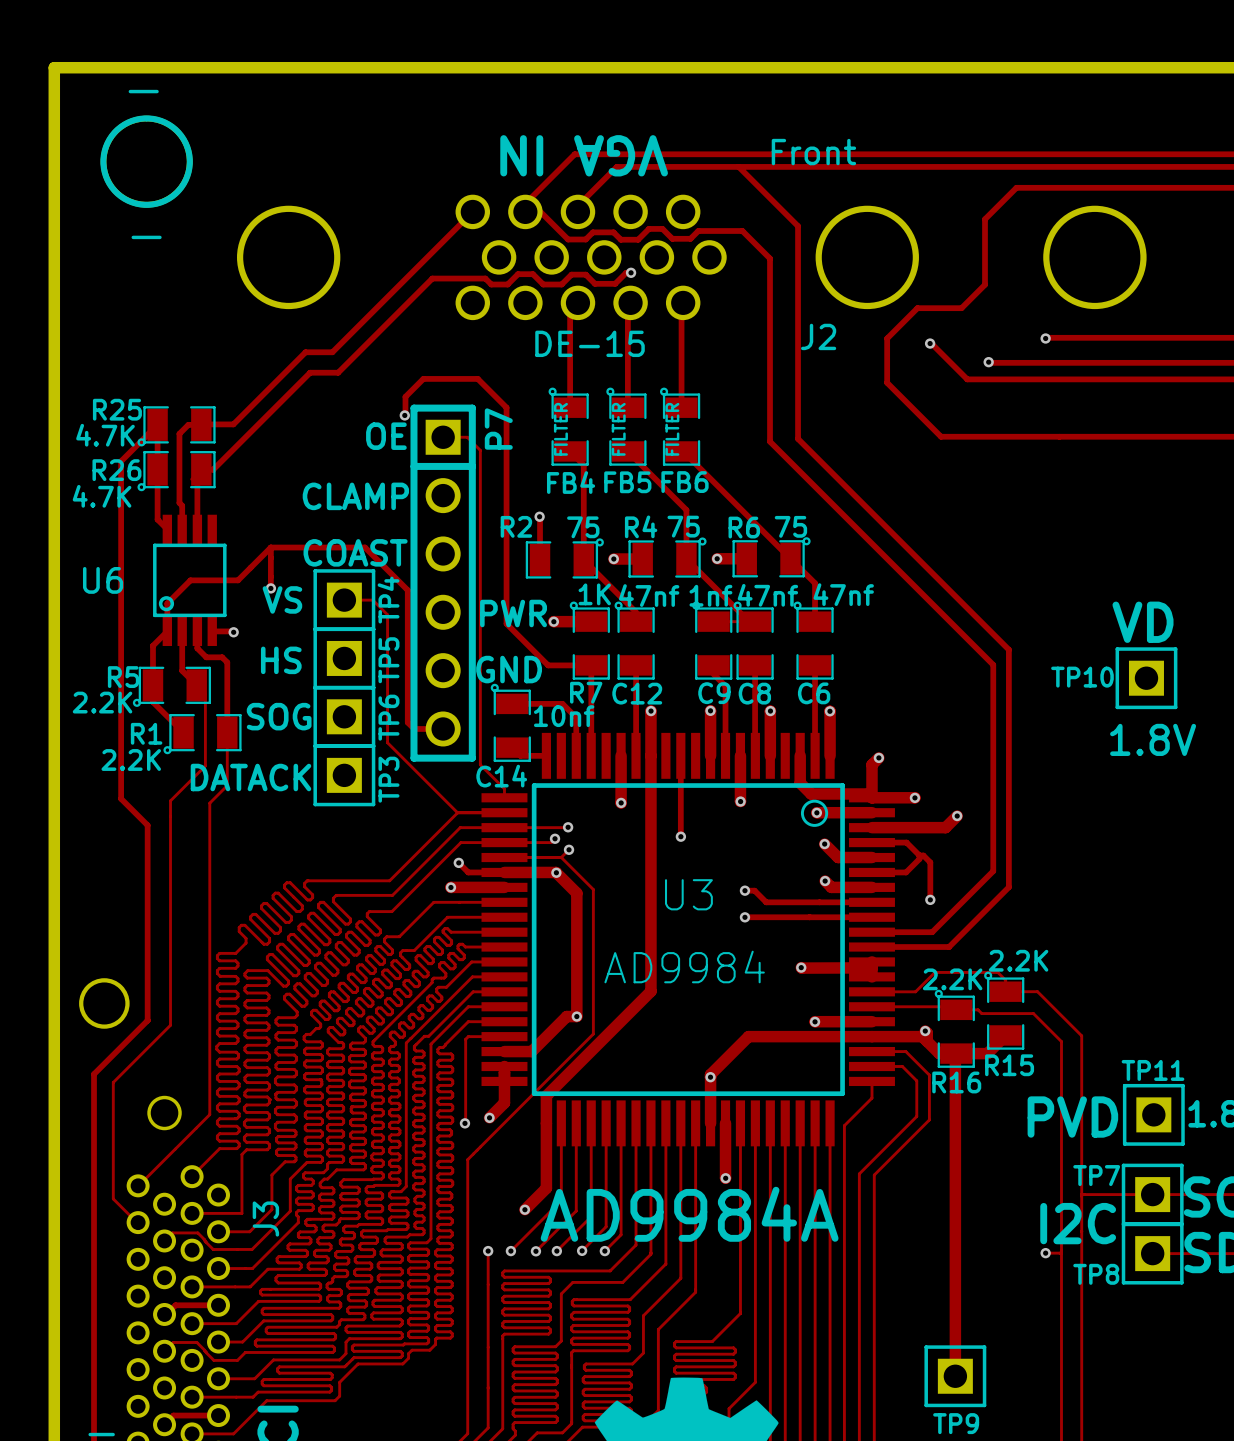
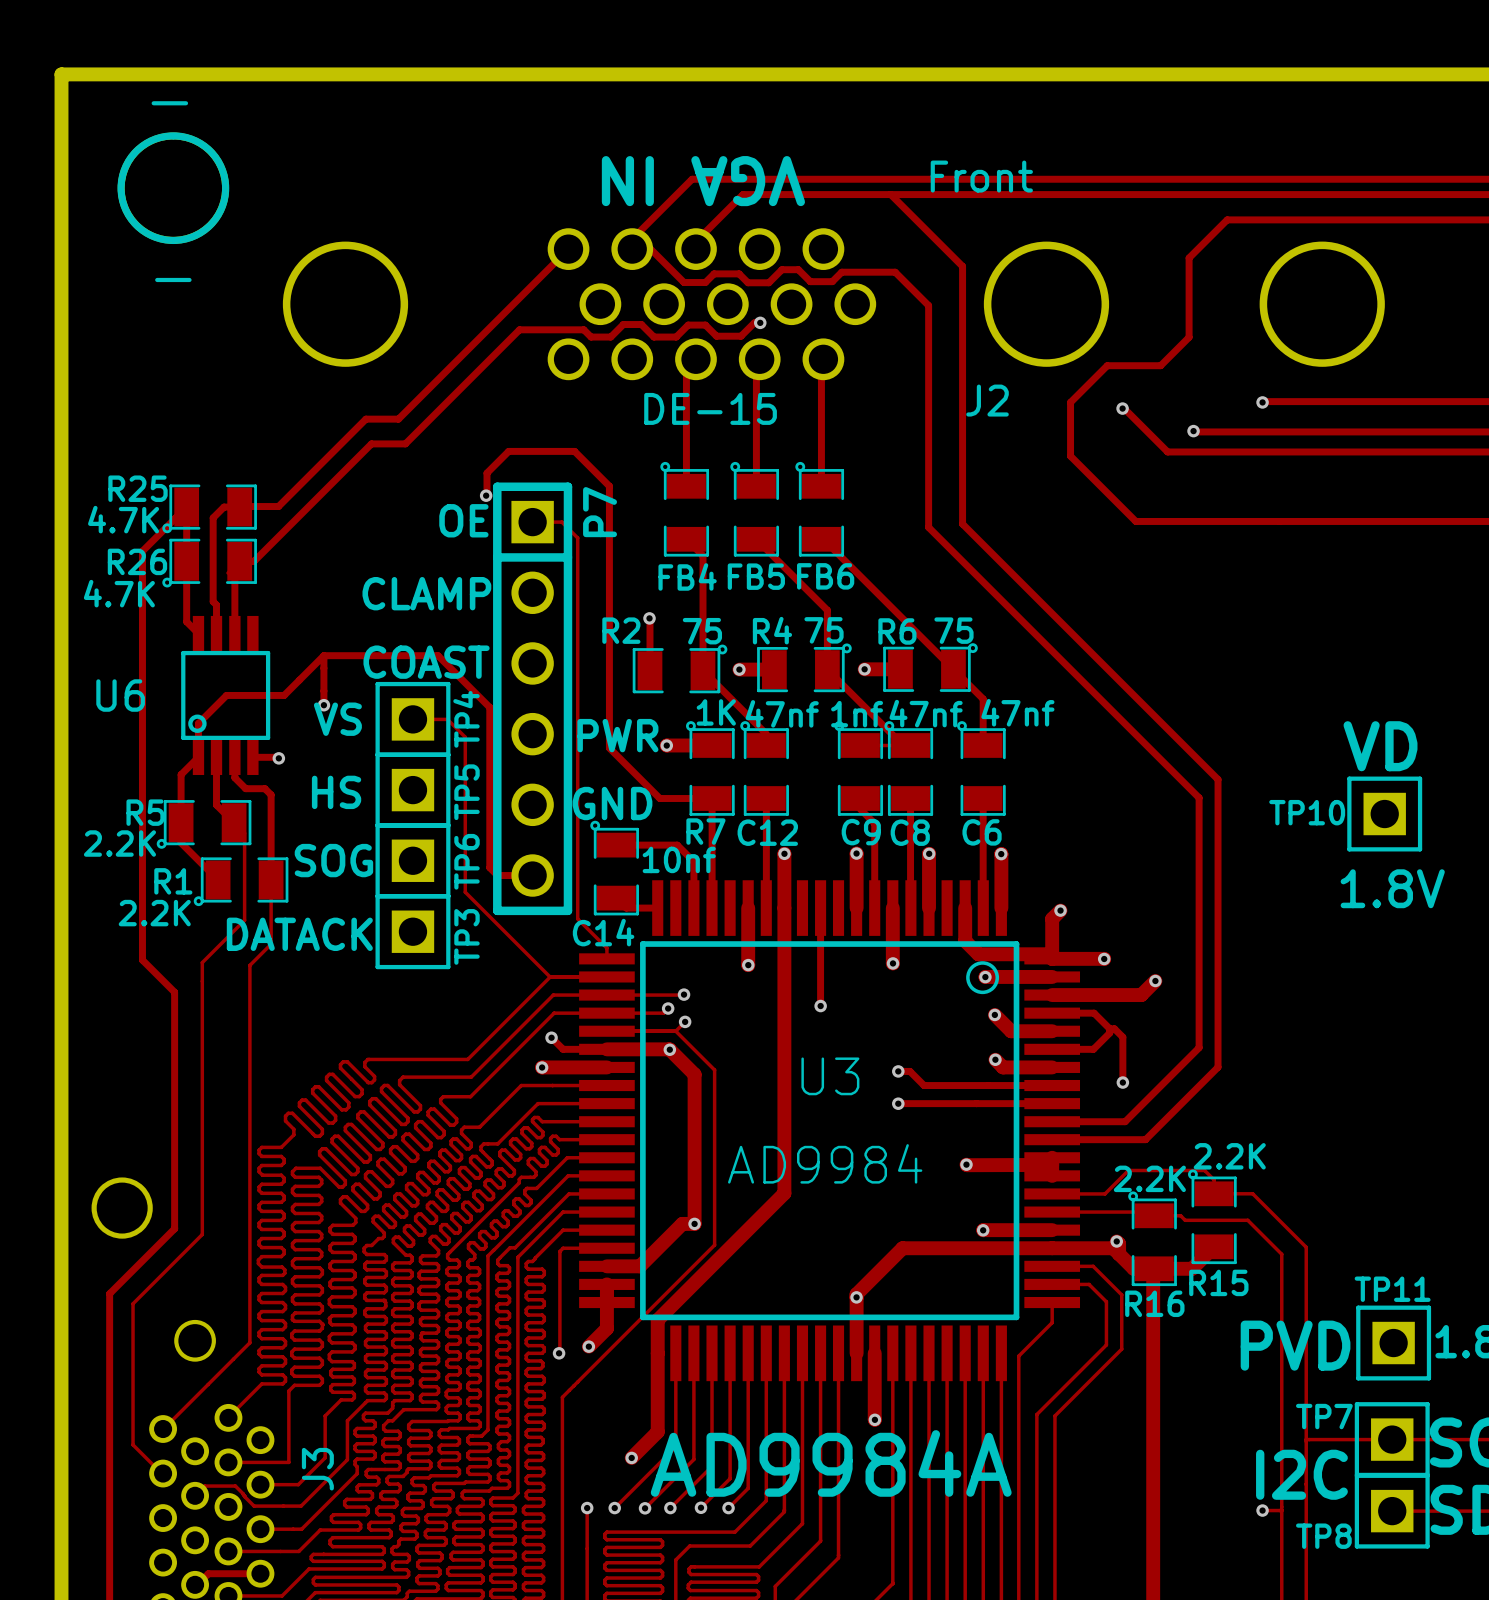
FB4 value: FILTER (560, 429) -> none
FB5 value: FILTER (618, 429) -> none
FB6 value: FILTER (672, 429) -> none

